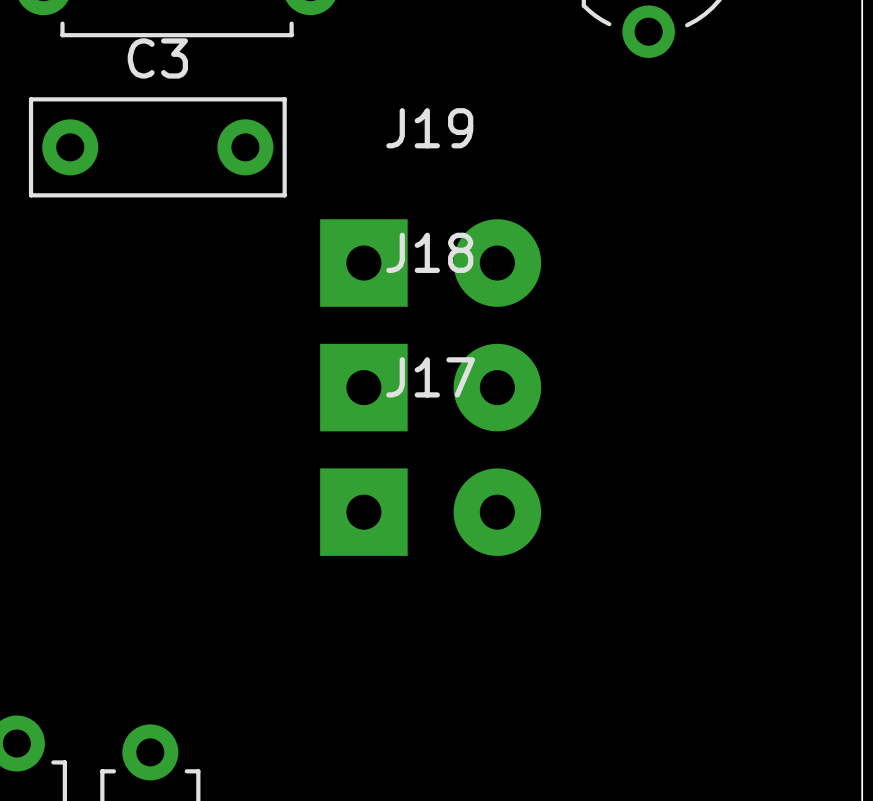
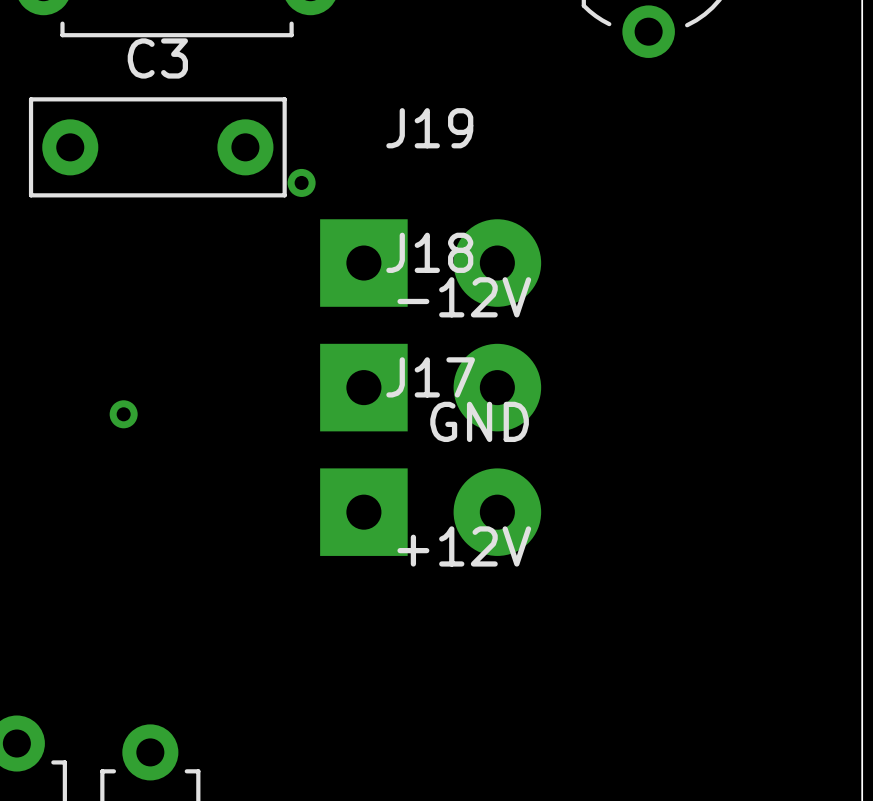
via: none -> (301, 182)
text: none -> -12V (464, 297)
via: none -> (123, 414)
text: none -> GND (479, 421)
text: none -> +12V (464, 546)

